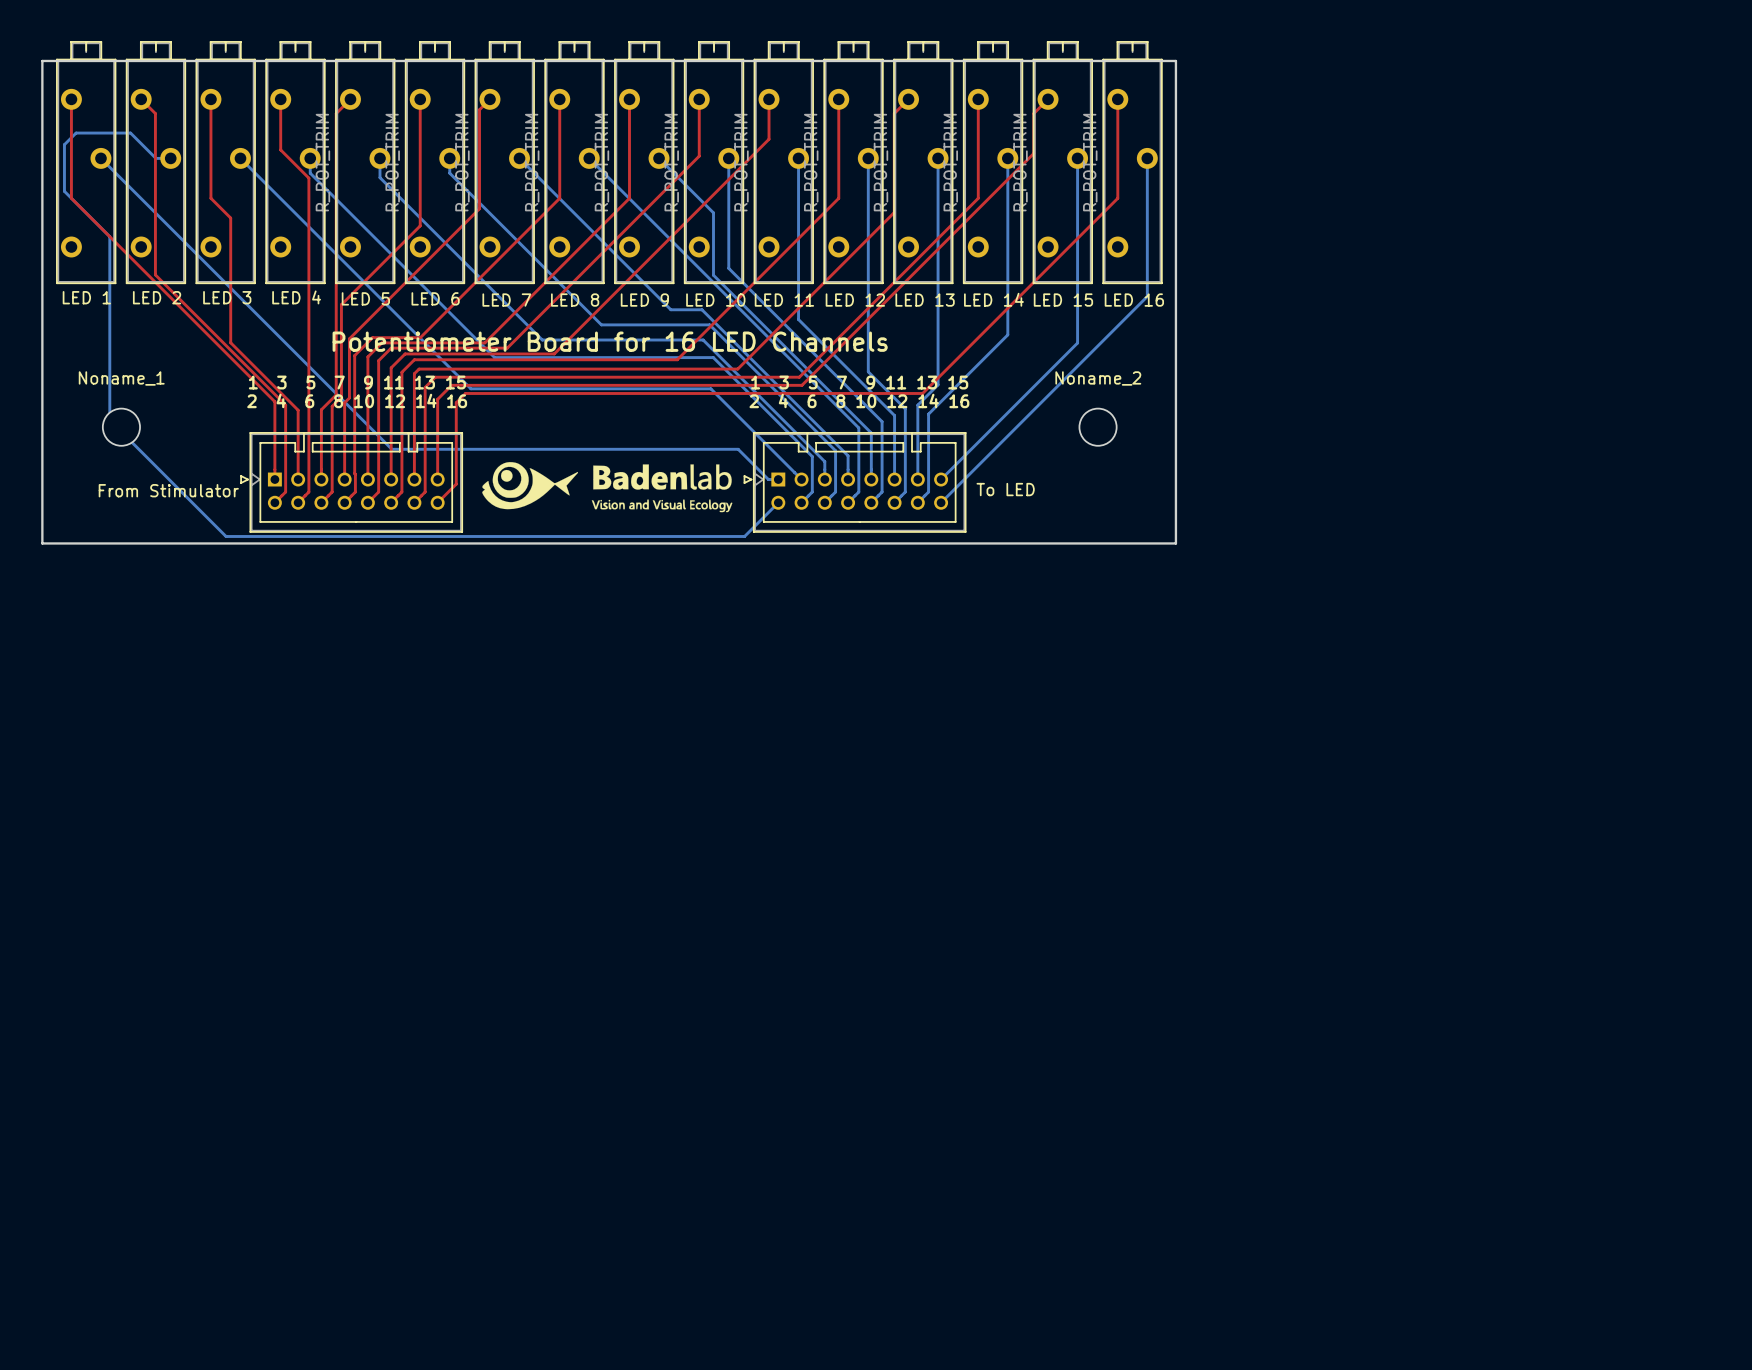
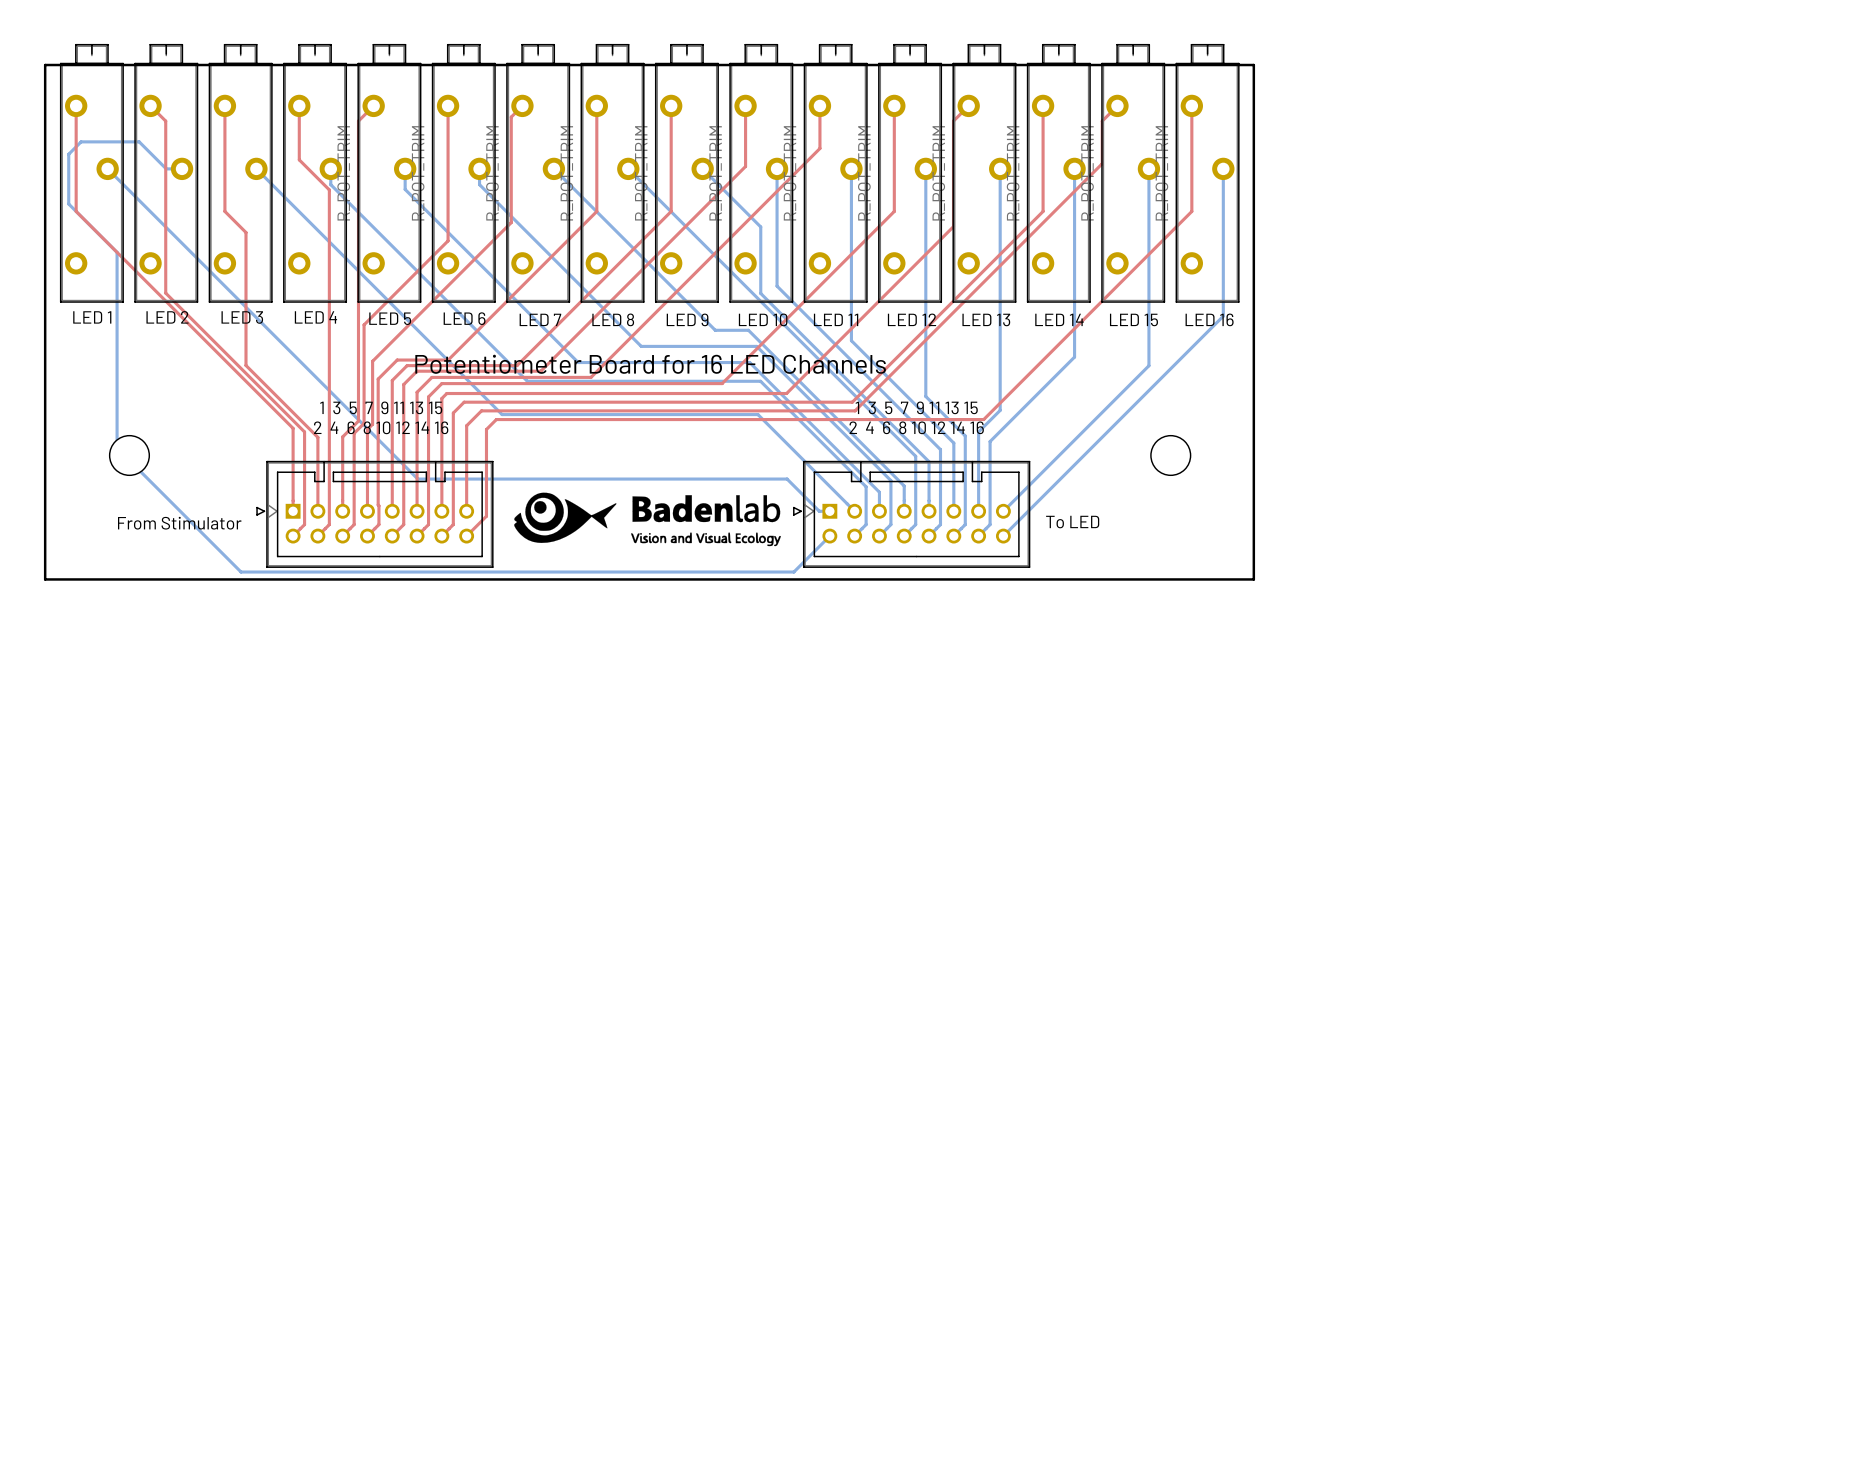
Noname_1 name: Noname_1 (121, 378) -> none
Noname_2 name: Noname_2 (1098, 378) -> none

